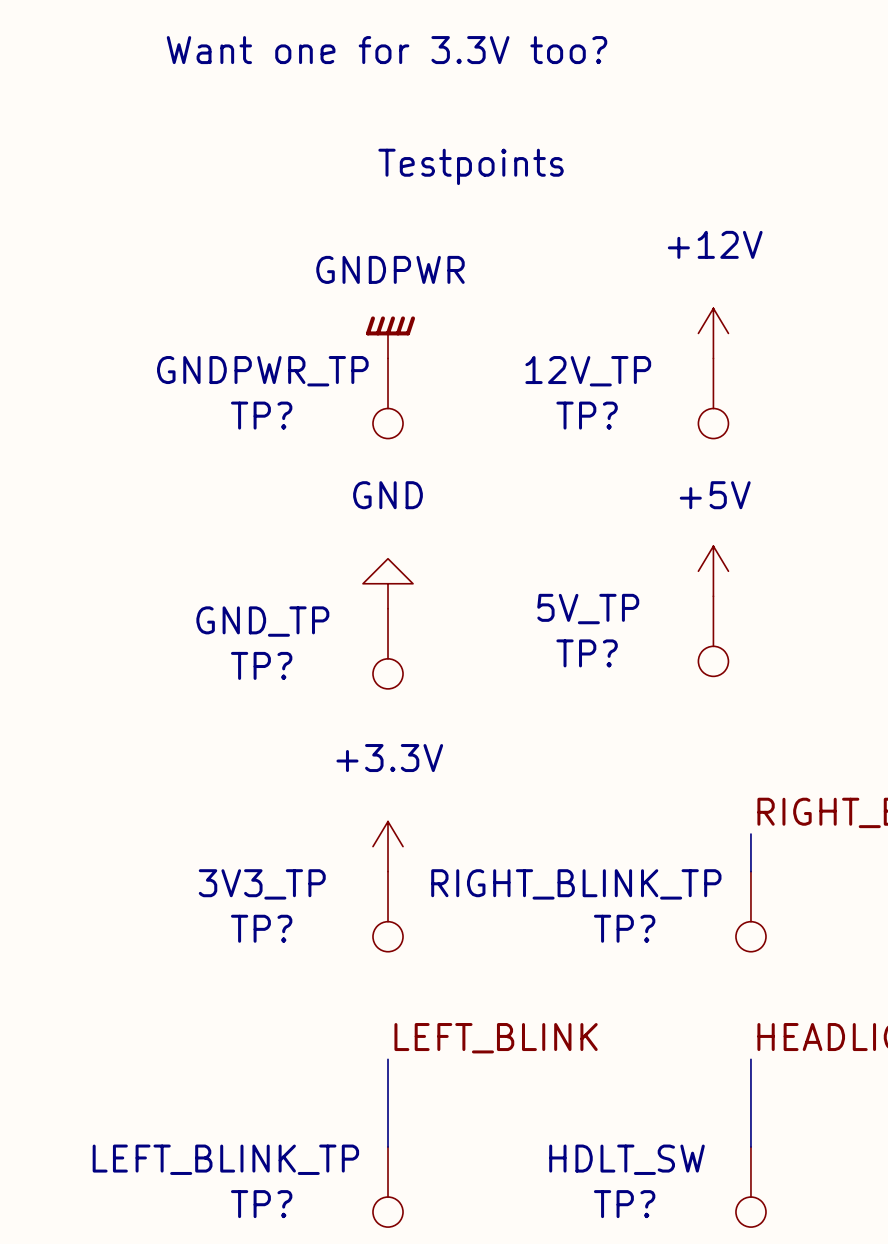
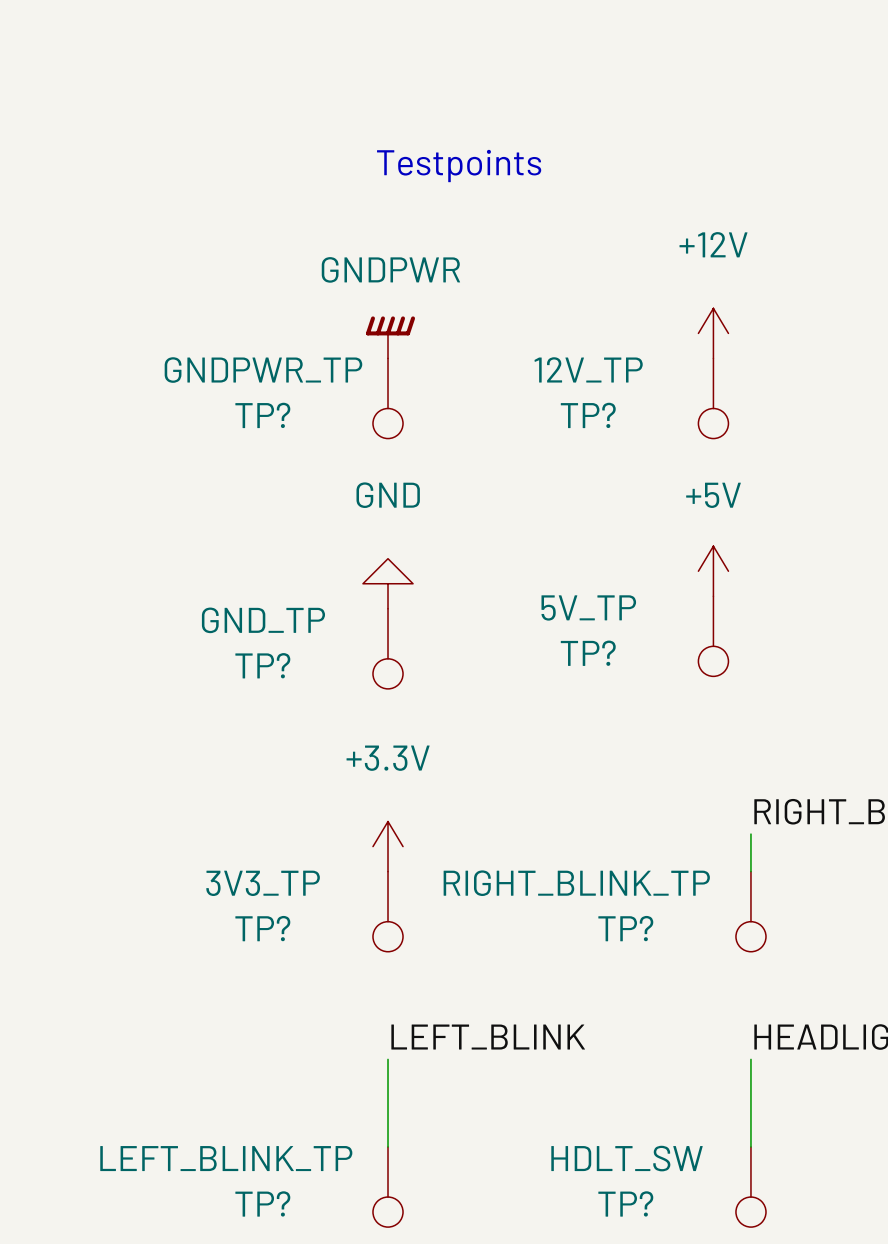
text: Want one for 3.3V too? (387, 50) -> none

